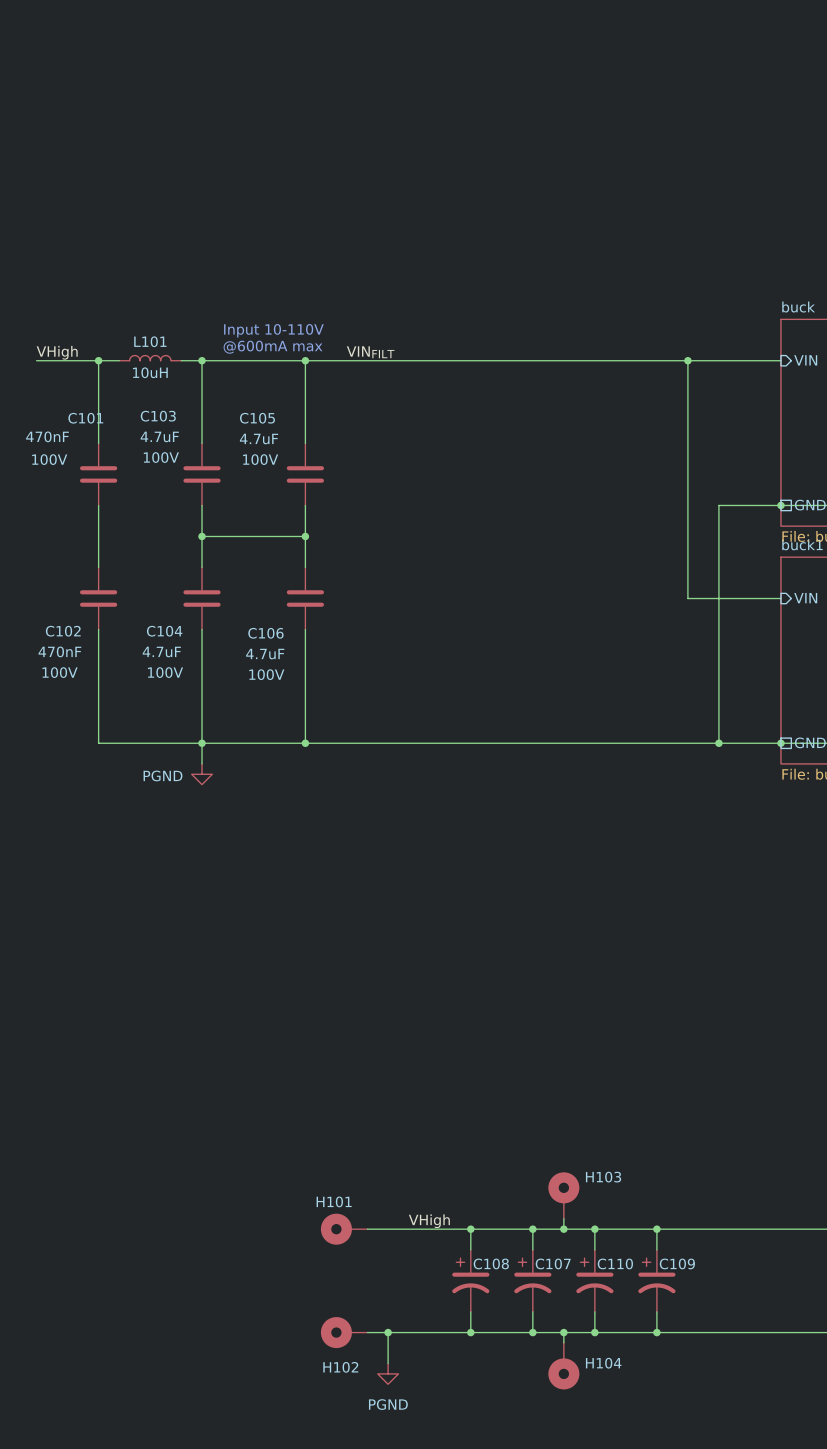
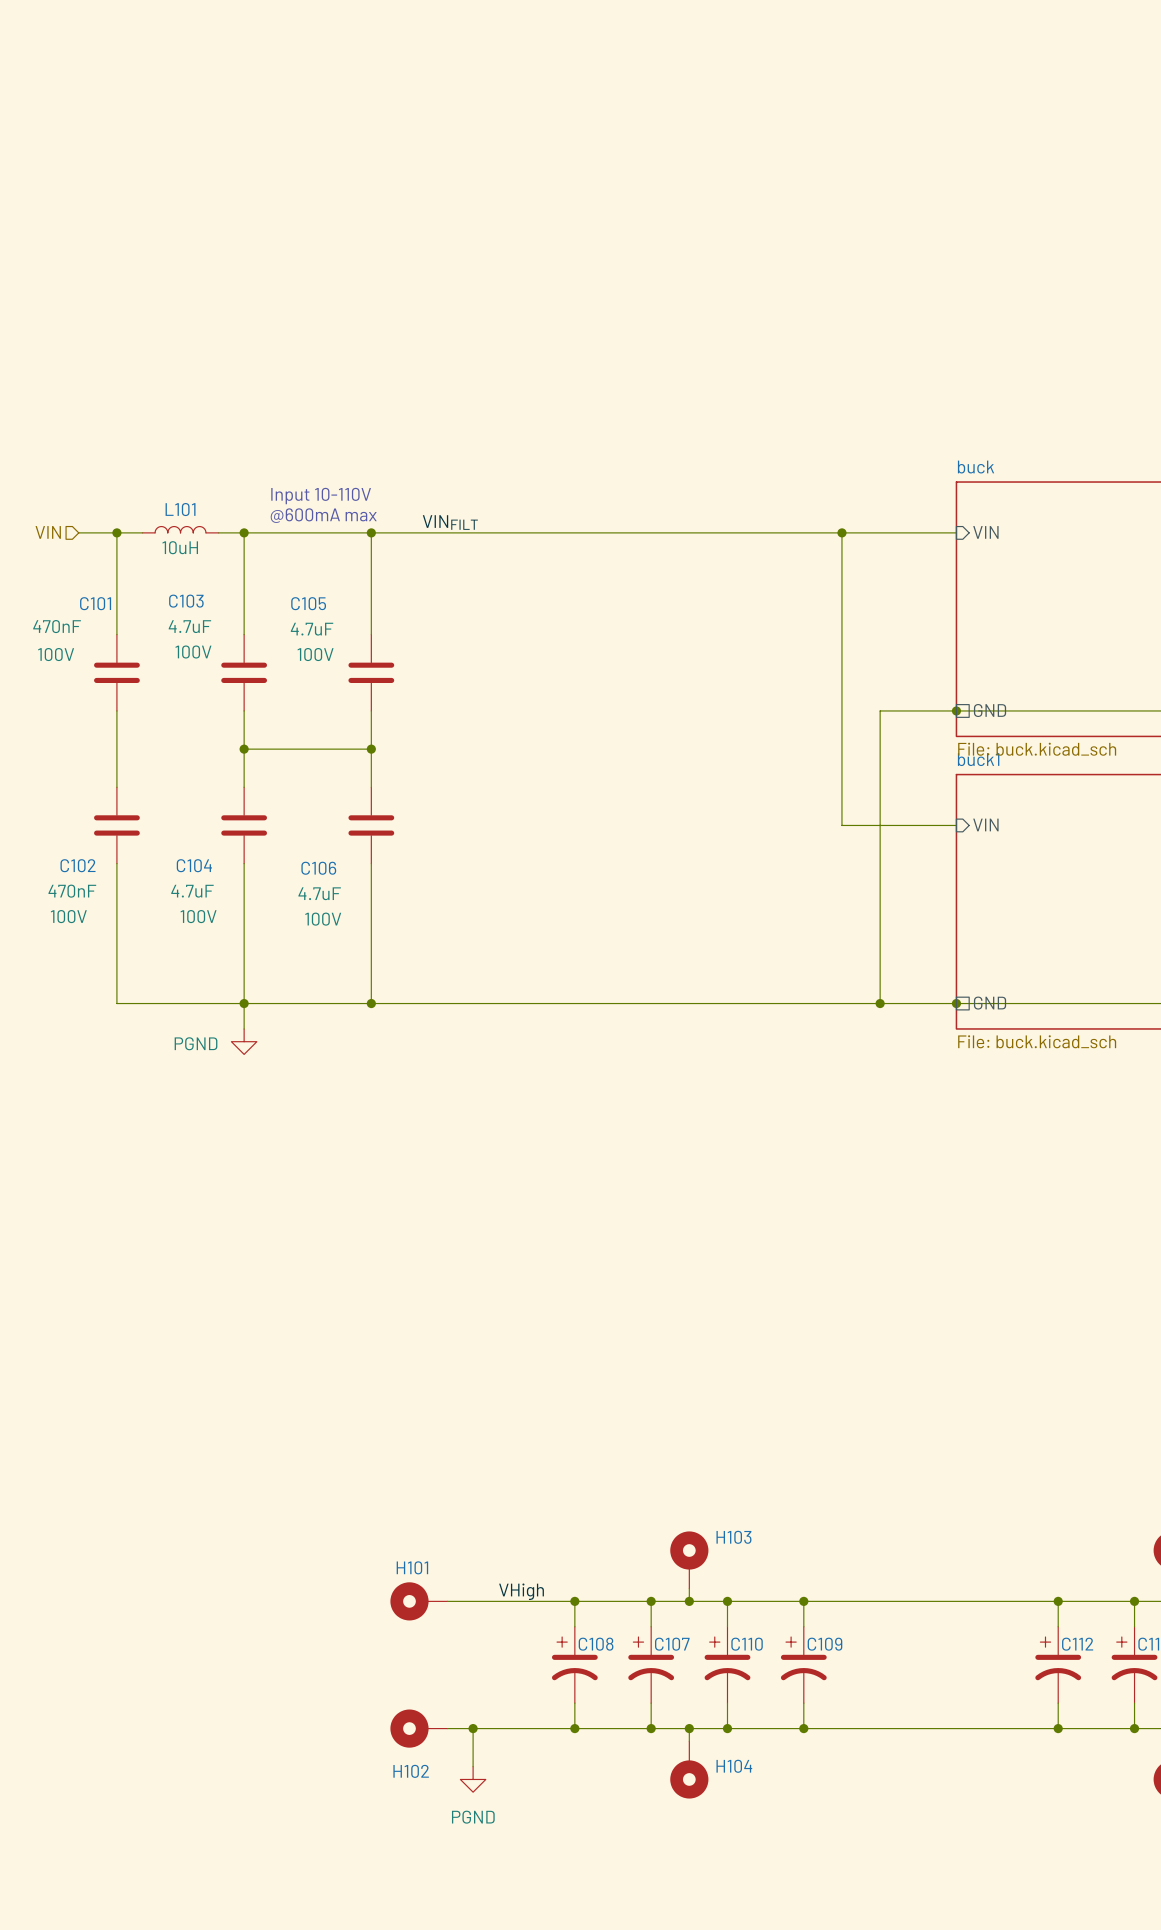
label: VHigh (57, 352) -> none
wire: (36, 360) (67, 360) -> none
hierarchical label: none -> VIN (48, 532)

